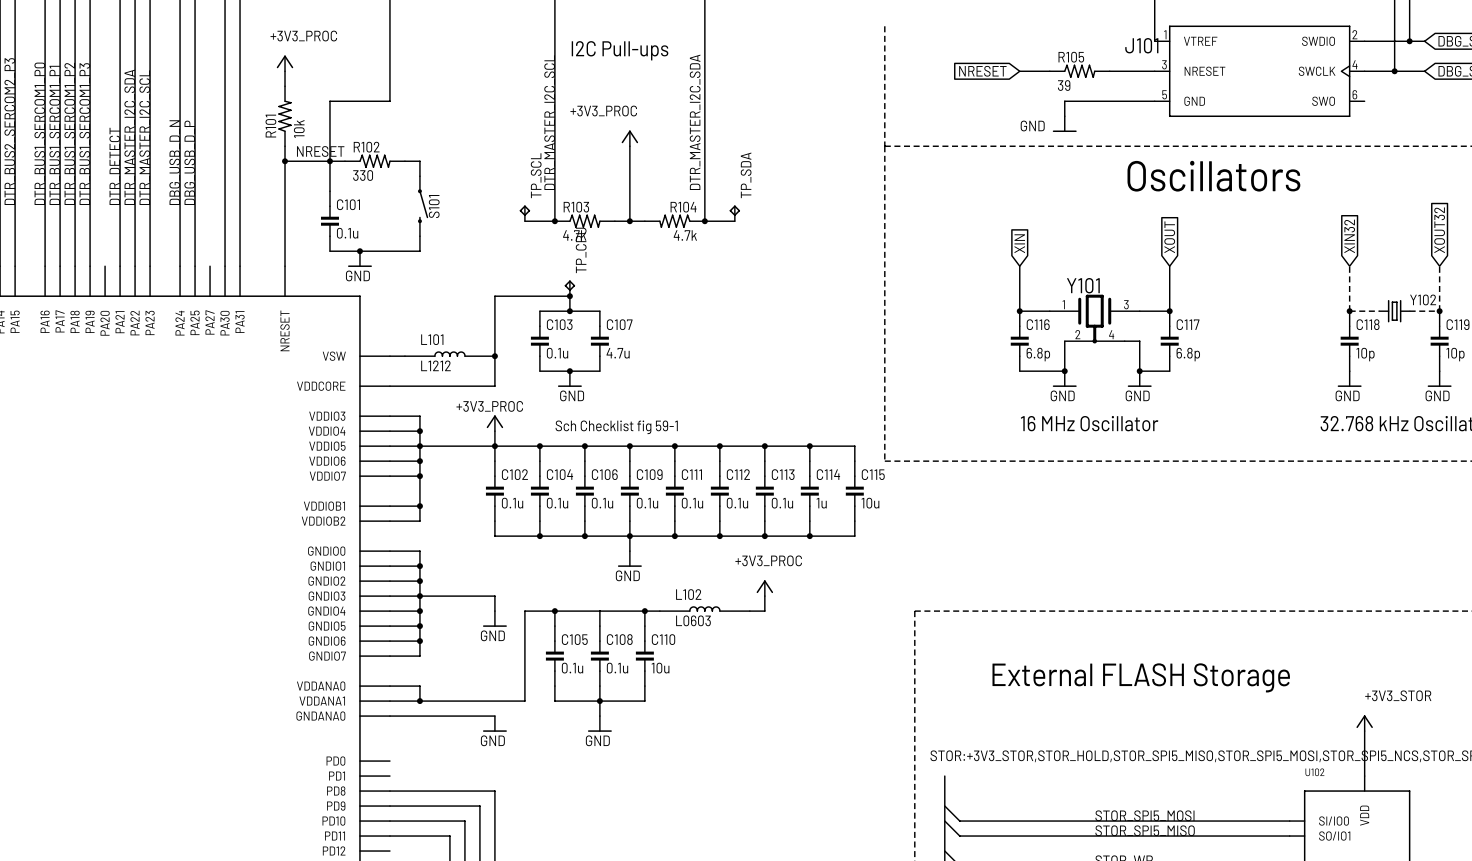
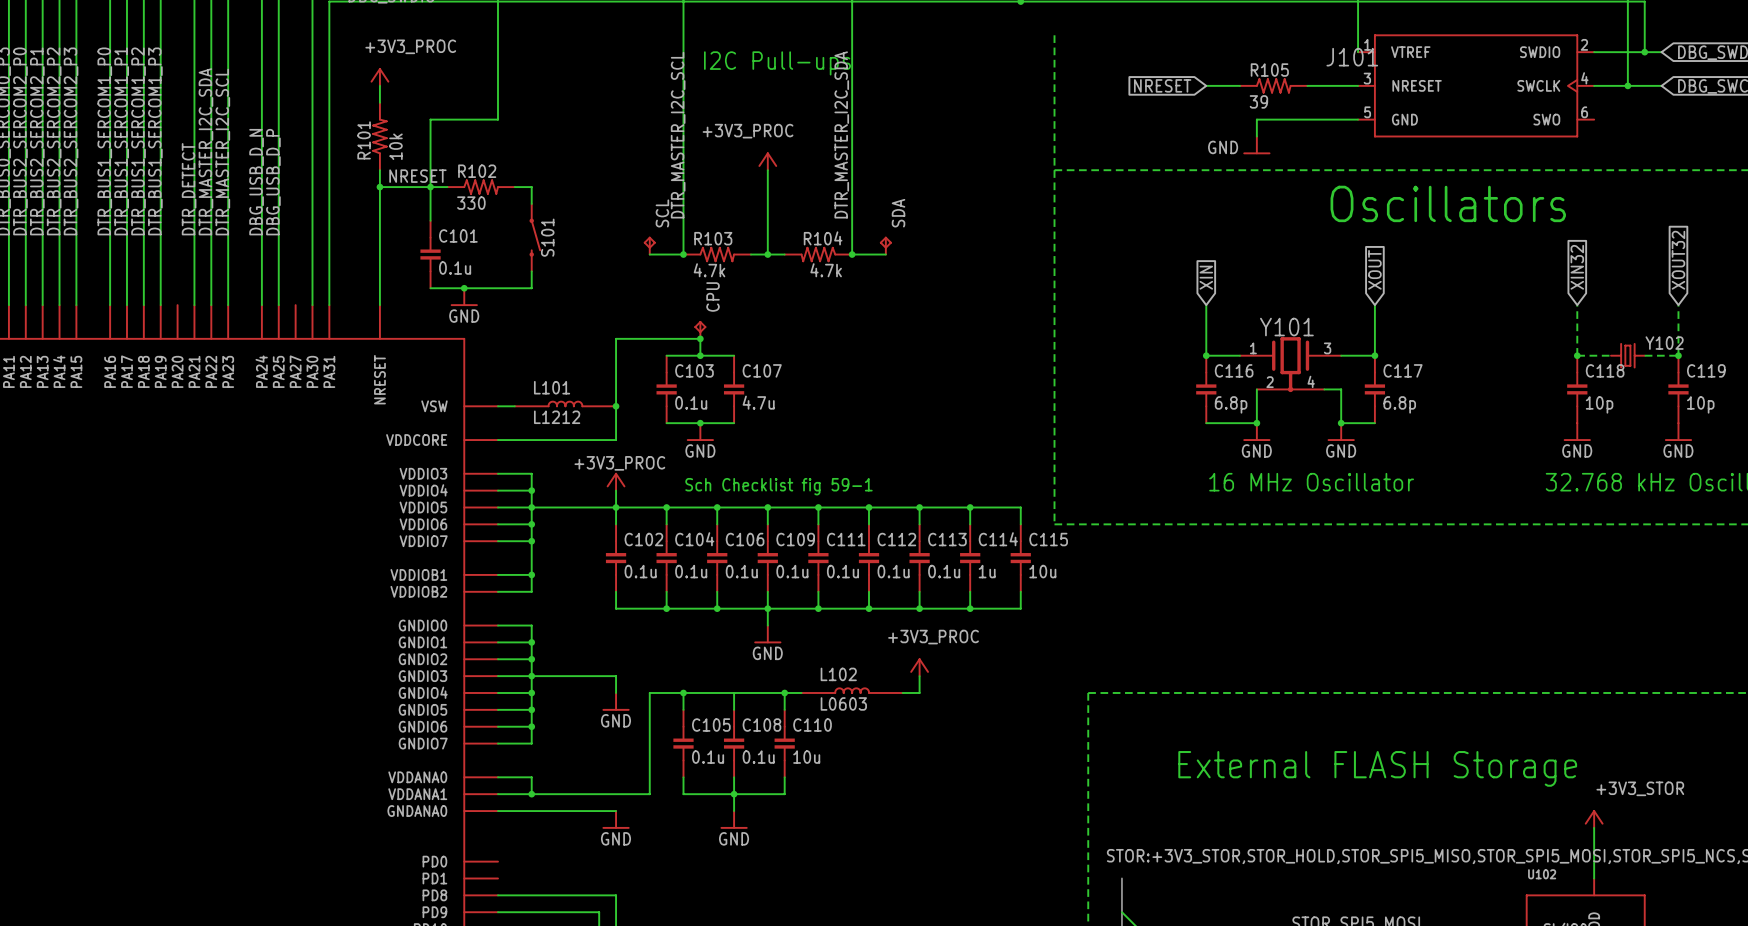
TP_SCL name: TP_SCL (536, 175) -> SCL (662, 213)
TP_SDA name: TP_SDA (746, 175) -> SDA (898, 213)
TP_CPU name: TP_CPU (581, 250) -> CPU (713, 296)

